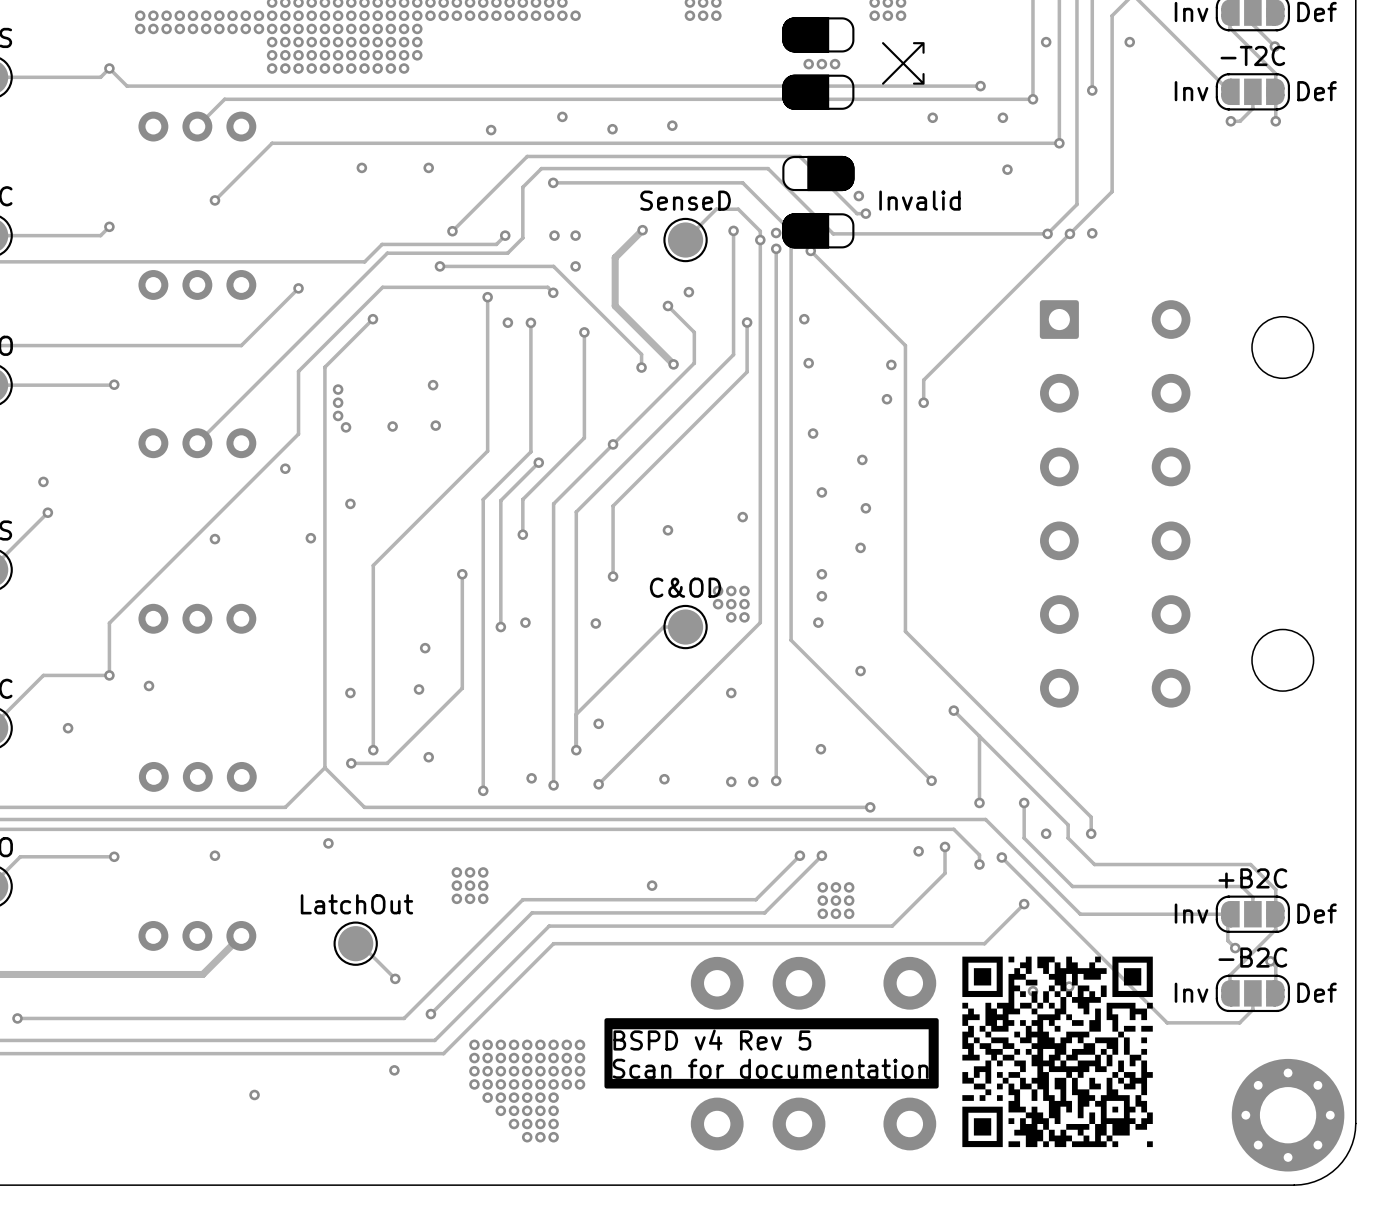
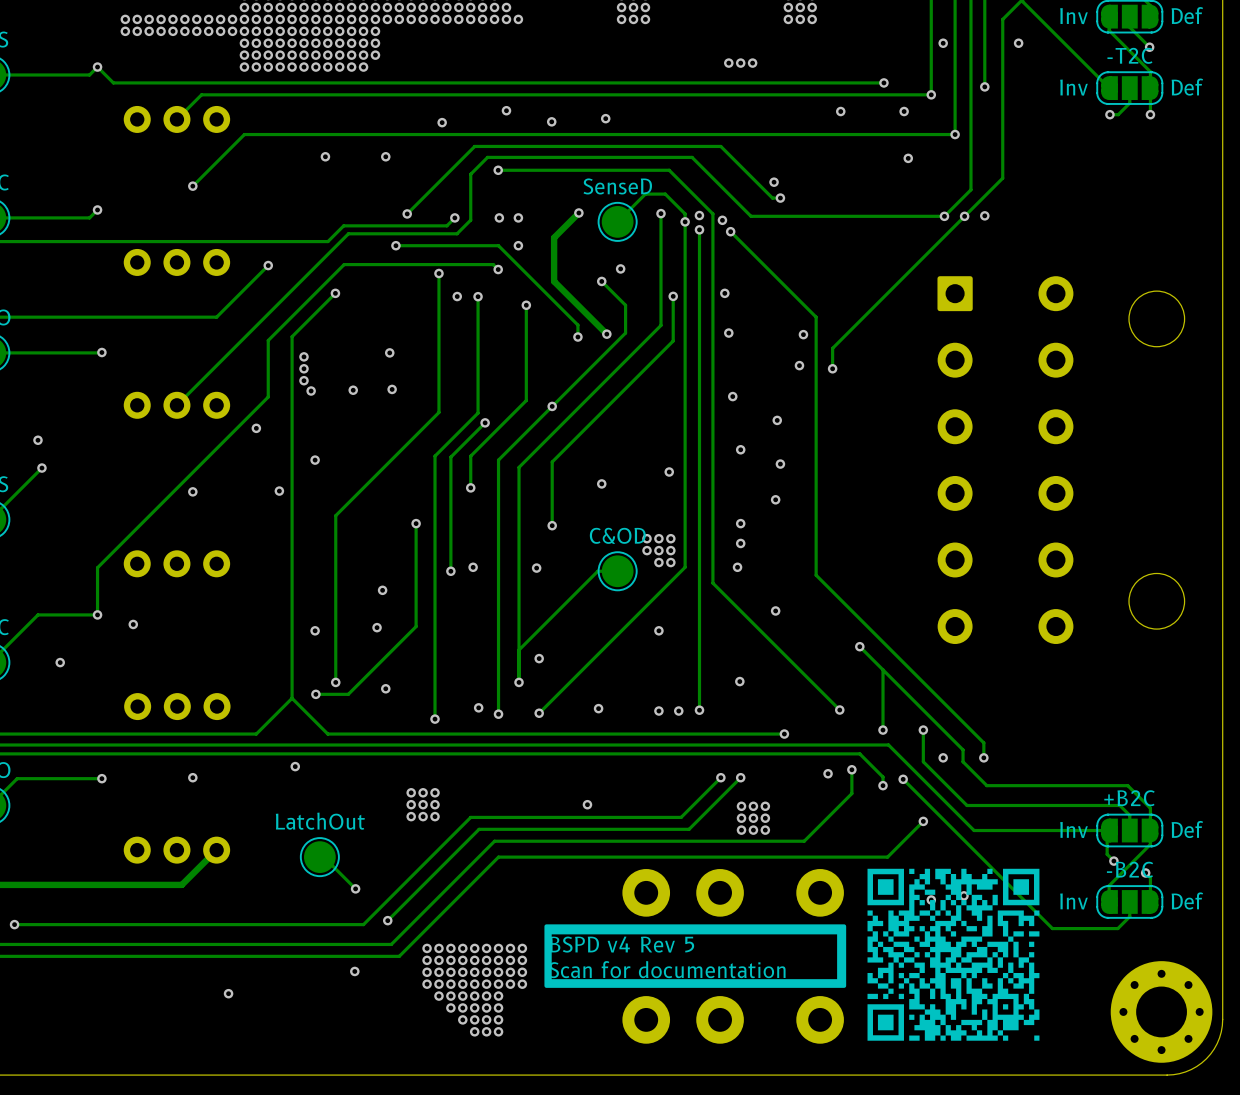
drawing: [782, 17, 855, 53] -> none
drawing: [882, 42, 925, 85] -> none
drawing: [782, 74, 855, 110] -> none
drawing: [782, 155, 855, 192] -> none
text: Invalid (919, 200) -> none
drawing: [782, 213, 855, 249] -> none

